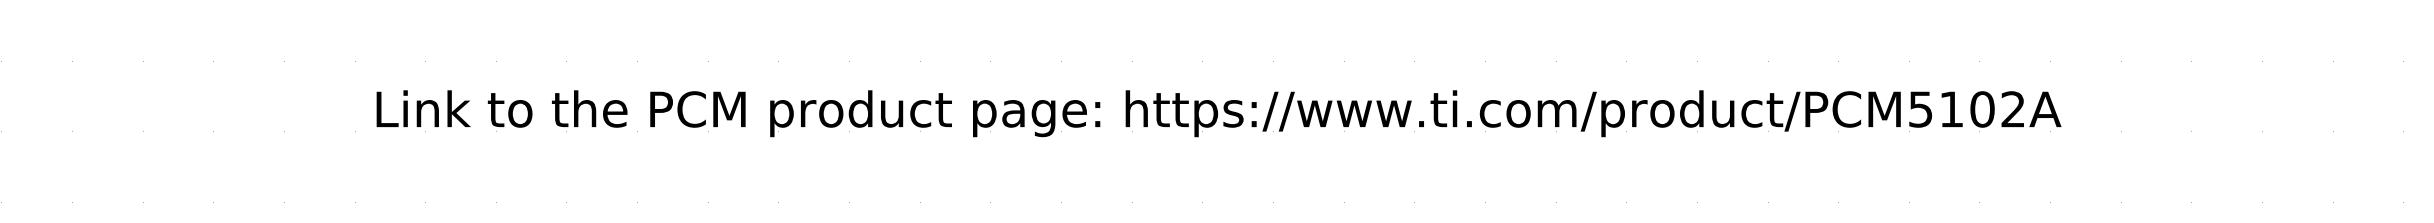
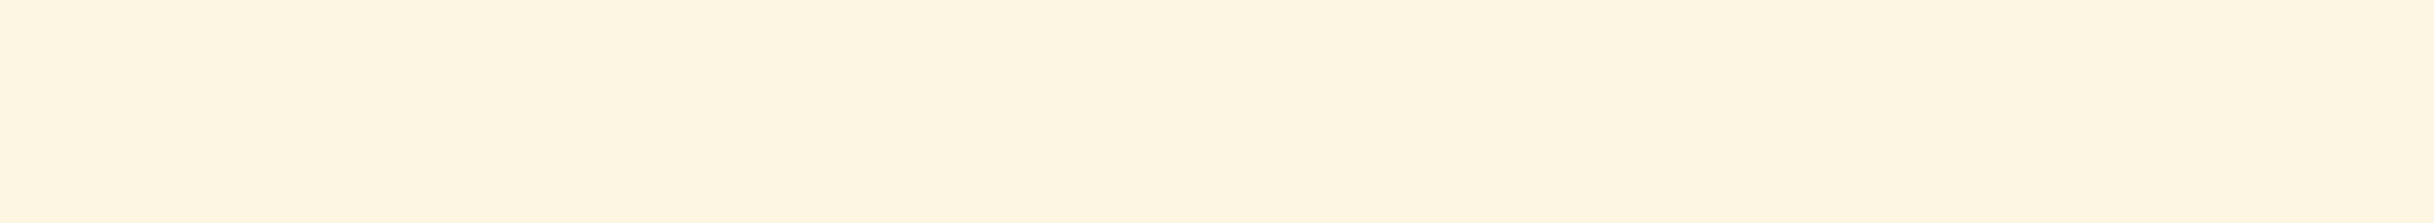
text: Link to the PCM product page: https://www.ti.com/product/PCM5102A (1219, 113) -> none

